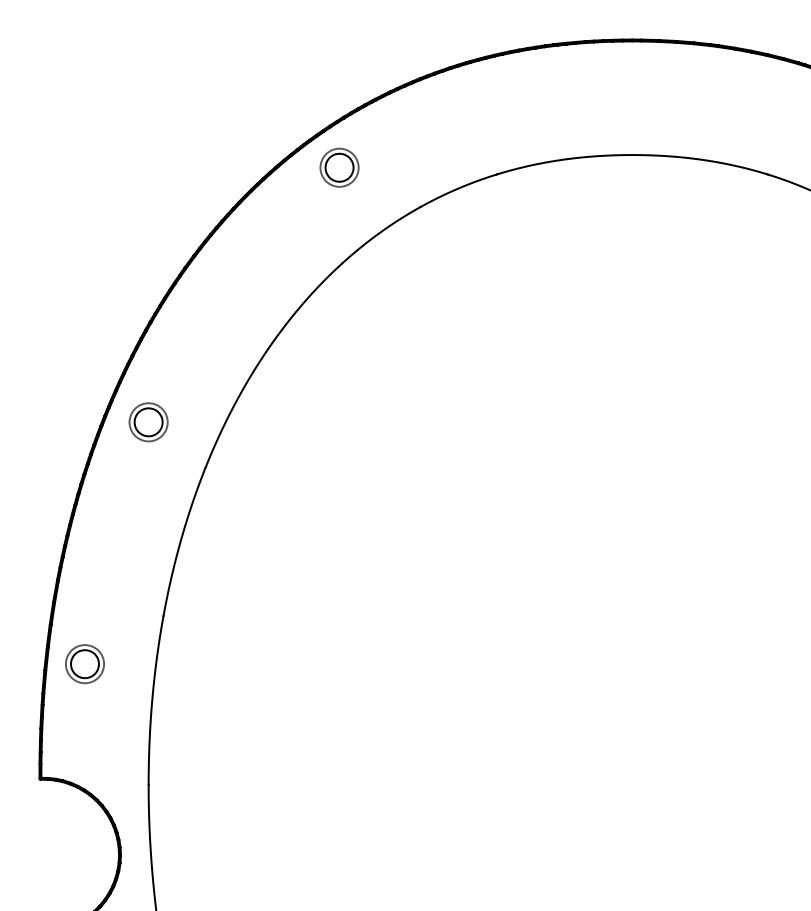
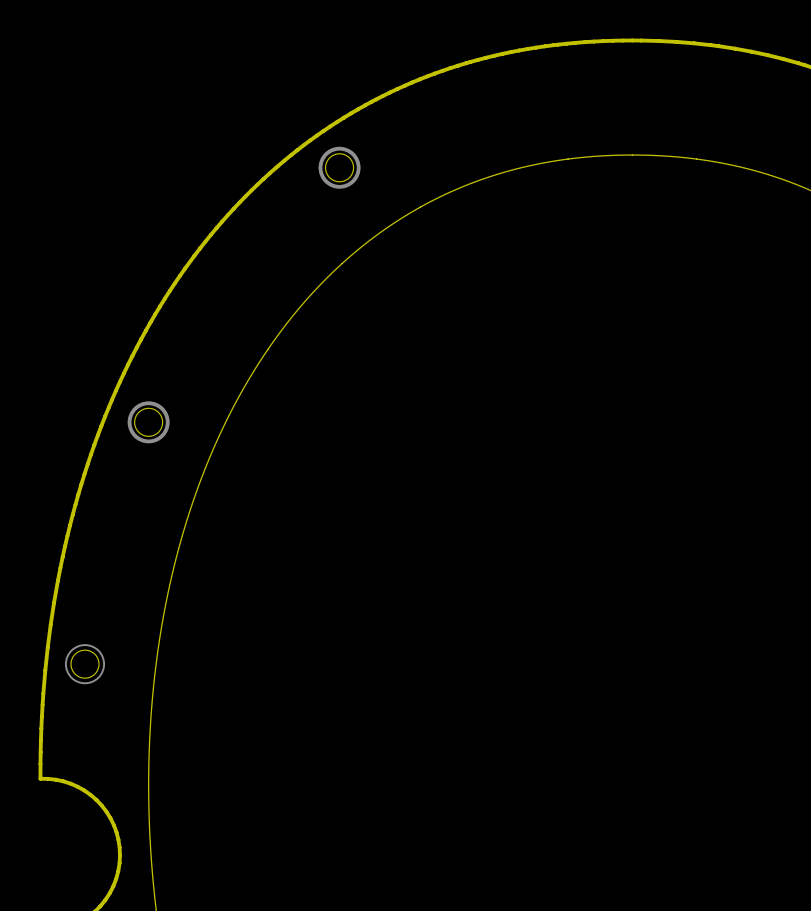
drawing: none -> [318, 146, 361, 189]
drawing: none -> [127, 401, 170, 444]

